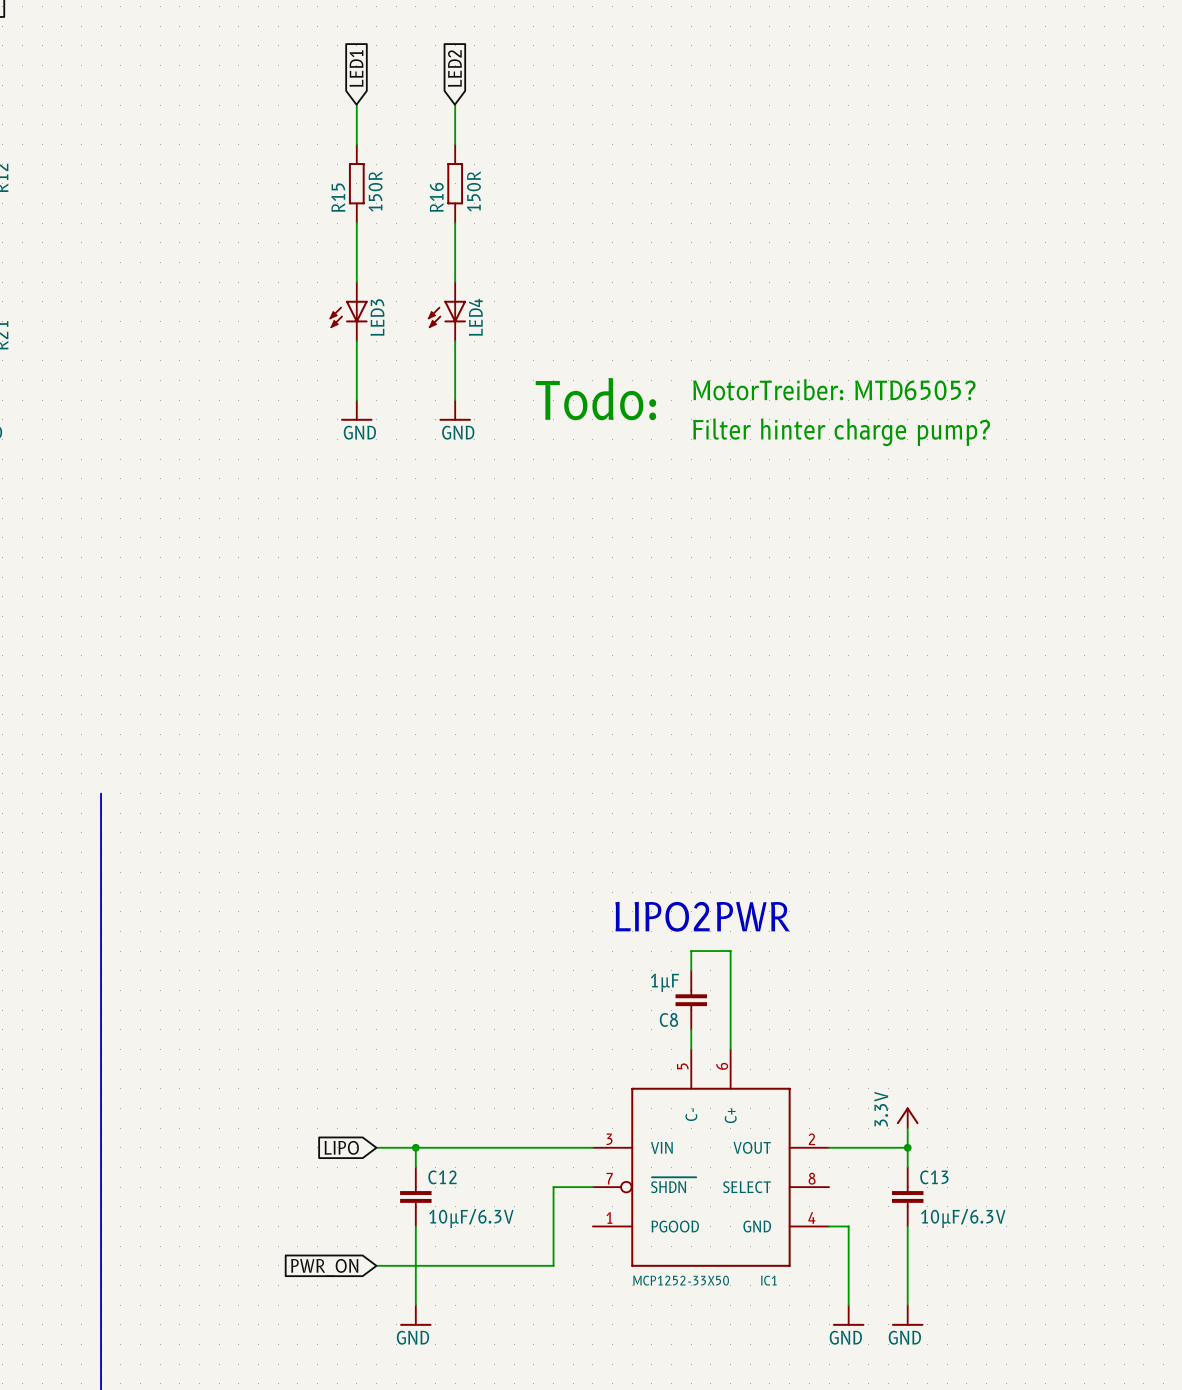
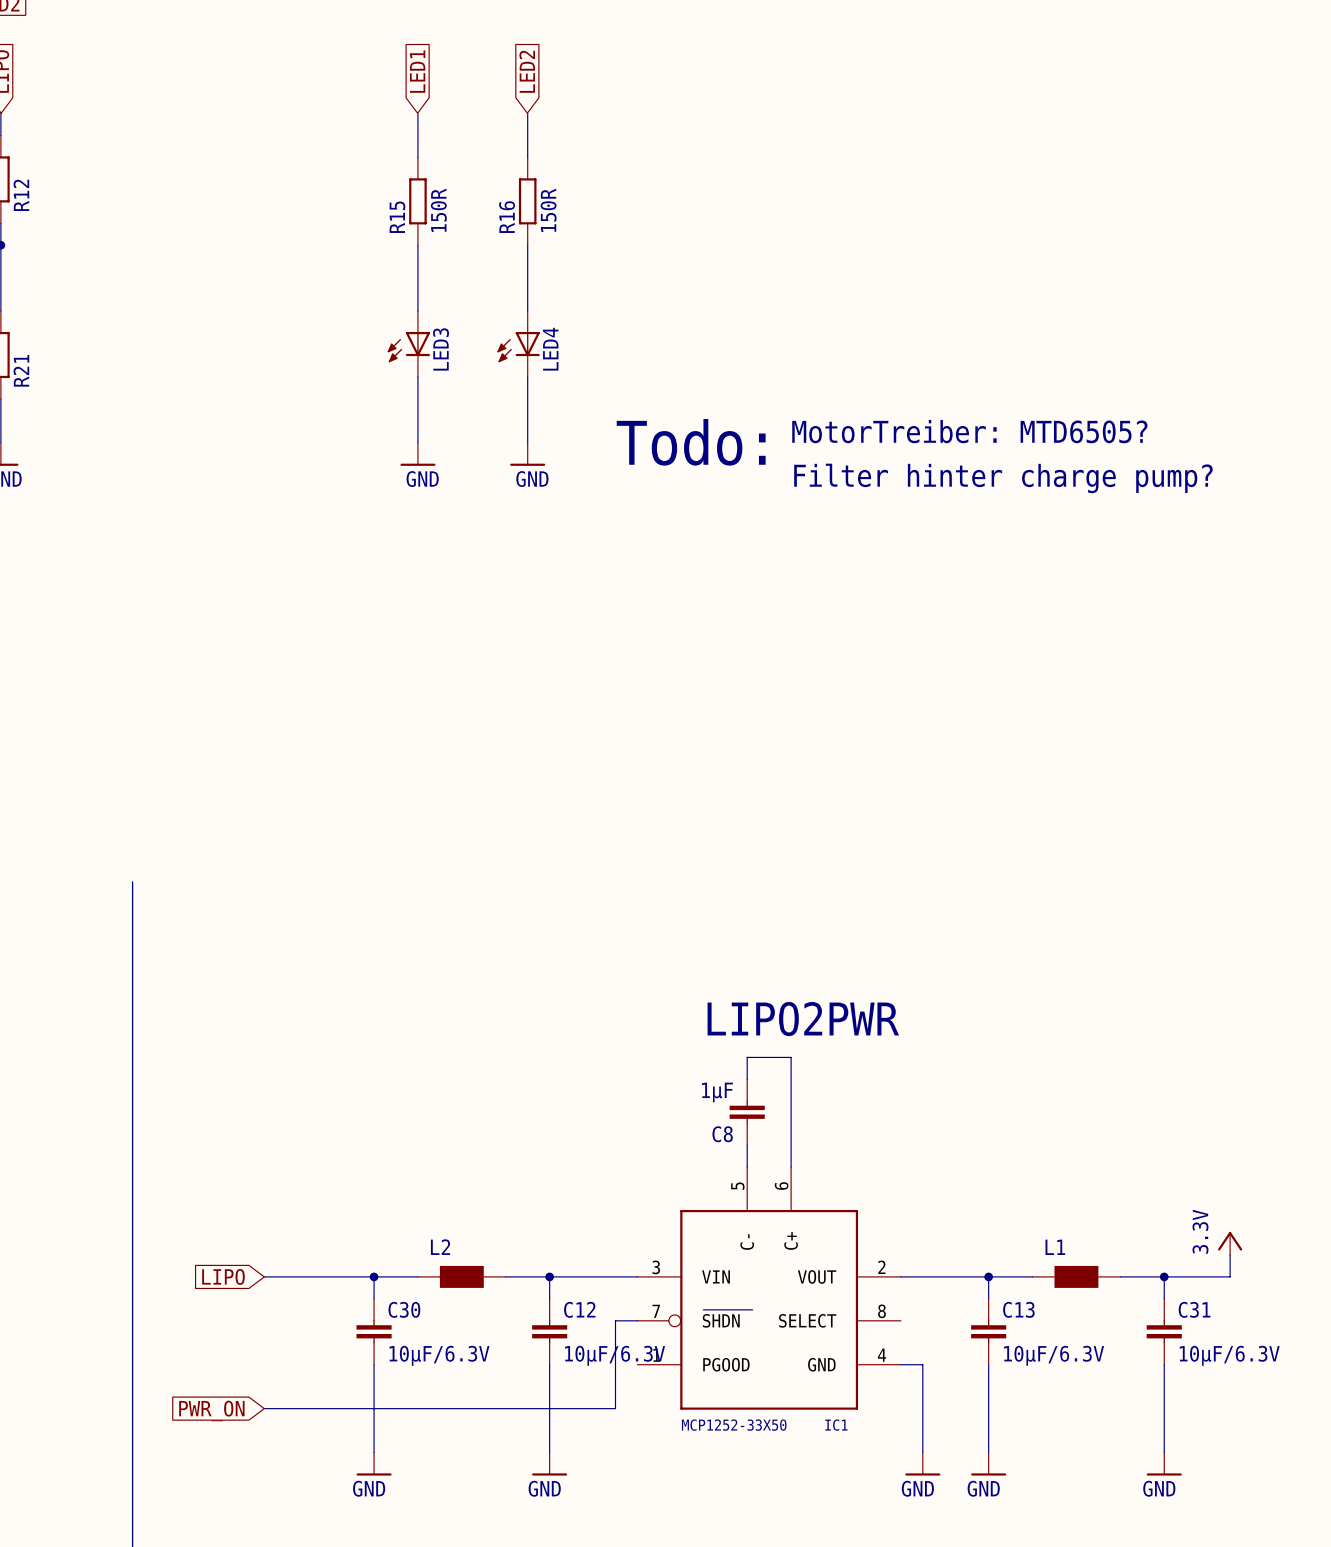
wire: (691, 951) (730, 951) (730, 1049) -> (791, 1057) (747, 1057) (747, 1079)
C8 position: (691, 1000) -> (747, 1112)
wire: none -> (747, 1145) (747, 1167)
power symbol position: 3.3V (907, 1117) -> 3.3V (1230, 1243)
wire: (907, 1128) (907, 1167) -> none
wire: none -> (1230, 1254) (1230, 1276) (1120, 1276)
wire: none -> (264, 1276) (417, 1276)
wire: none -> (374, 1276) (374, 1298)
junction: none -> (374, 1276)
global label position: LIPO (341, 1147) -> LIPO (223, 1276)
L2: none -> (461, 1276)
wire: (415, 1147) (415, 1167) -> (549, 1276) (549, 1298)
junction: (415, 1147) -> none
junction: none -> (549, 1276)
wire: none -> (988, 1276) (988, 1298)
junction position: (907, 1147) -> (988, 1276)
L1: none -> (1076, 1276)
wire: none -> (1164, 1276) (1164, 1298)
junction: none -> (1164, 1276)
IC1 position: (710, 1158) -> (769, 1288)
wire: (592, 1187) (553, 1187) (553, 1265) (533, 1265) -> (637, 1320) (615, 1320) (615, 1408)
C30: none -> 10µF/6.3V (374, 1331)
C12 position: (415, 1196) -> (549, 1331)
C13 position: (907, 1196) -> (988, 1331)
C31: none -> 10µF/6.3V (1164, 1331)
wire: none -> (374, 1364) (374, 1452)
wire: (415, 1226) (415, 1305) -> (549, 1364) (549, 1452)
wire: (829, 1226) (848, 1226) (848, 1305) -> (900, 1364) (922, 1364) (922, 1452)
wire: (907, 1226) (907, 1305) -> (988, 1364) (988, 1452)
wire: none -> (1164, 1364) (1164, 1452)
wire: none -> (264, 1408) (439, 1408)
global label position: PWR_ON (324, 1267) -> PWR_ON (211, 1410)
power symbol: none -> GND (374, 1464)
power symbol: GND (415, 1315) -> none
power symbol: none -> GND (549, 1464)
power symbol: none -> GND (922, 1464)
power symbol: GND (848, 1315) -> none
power symbol: none -> GND (988, 1464)
power symbol: GND (907, 1315) -> none
power symbol: none -> GND (1164, 1464)

